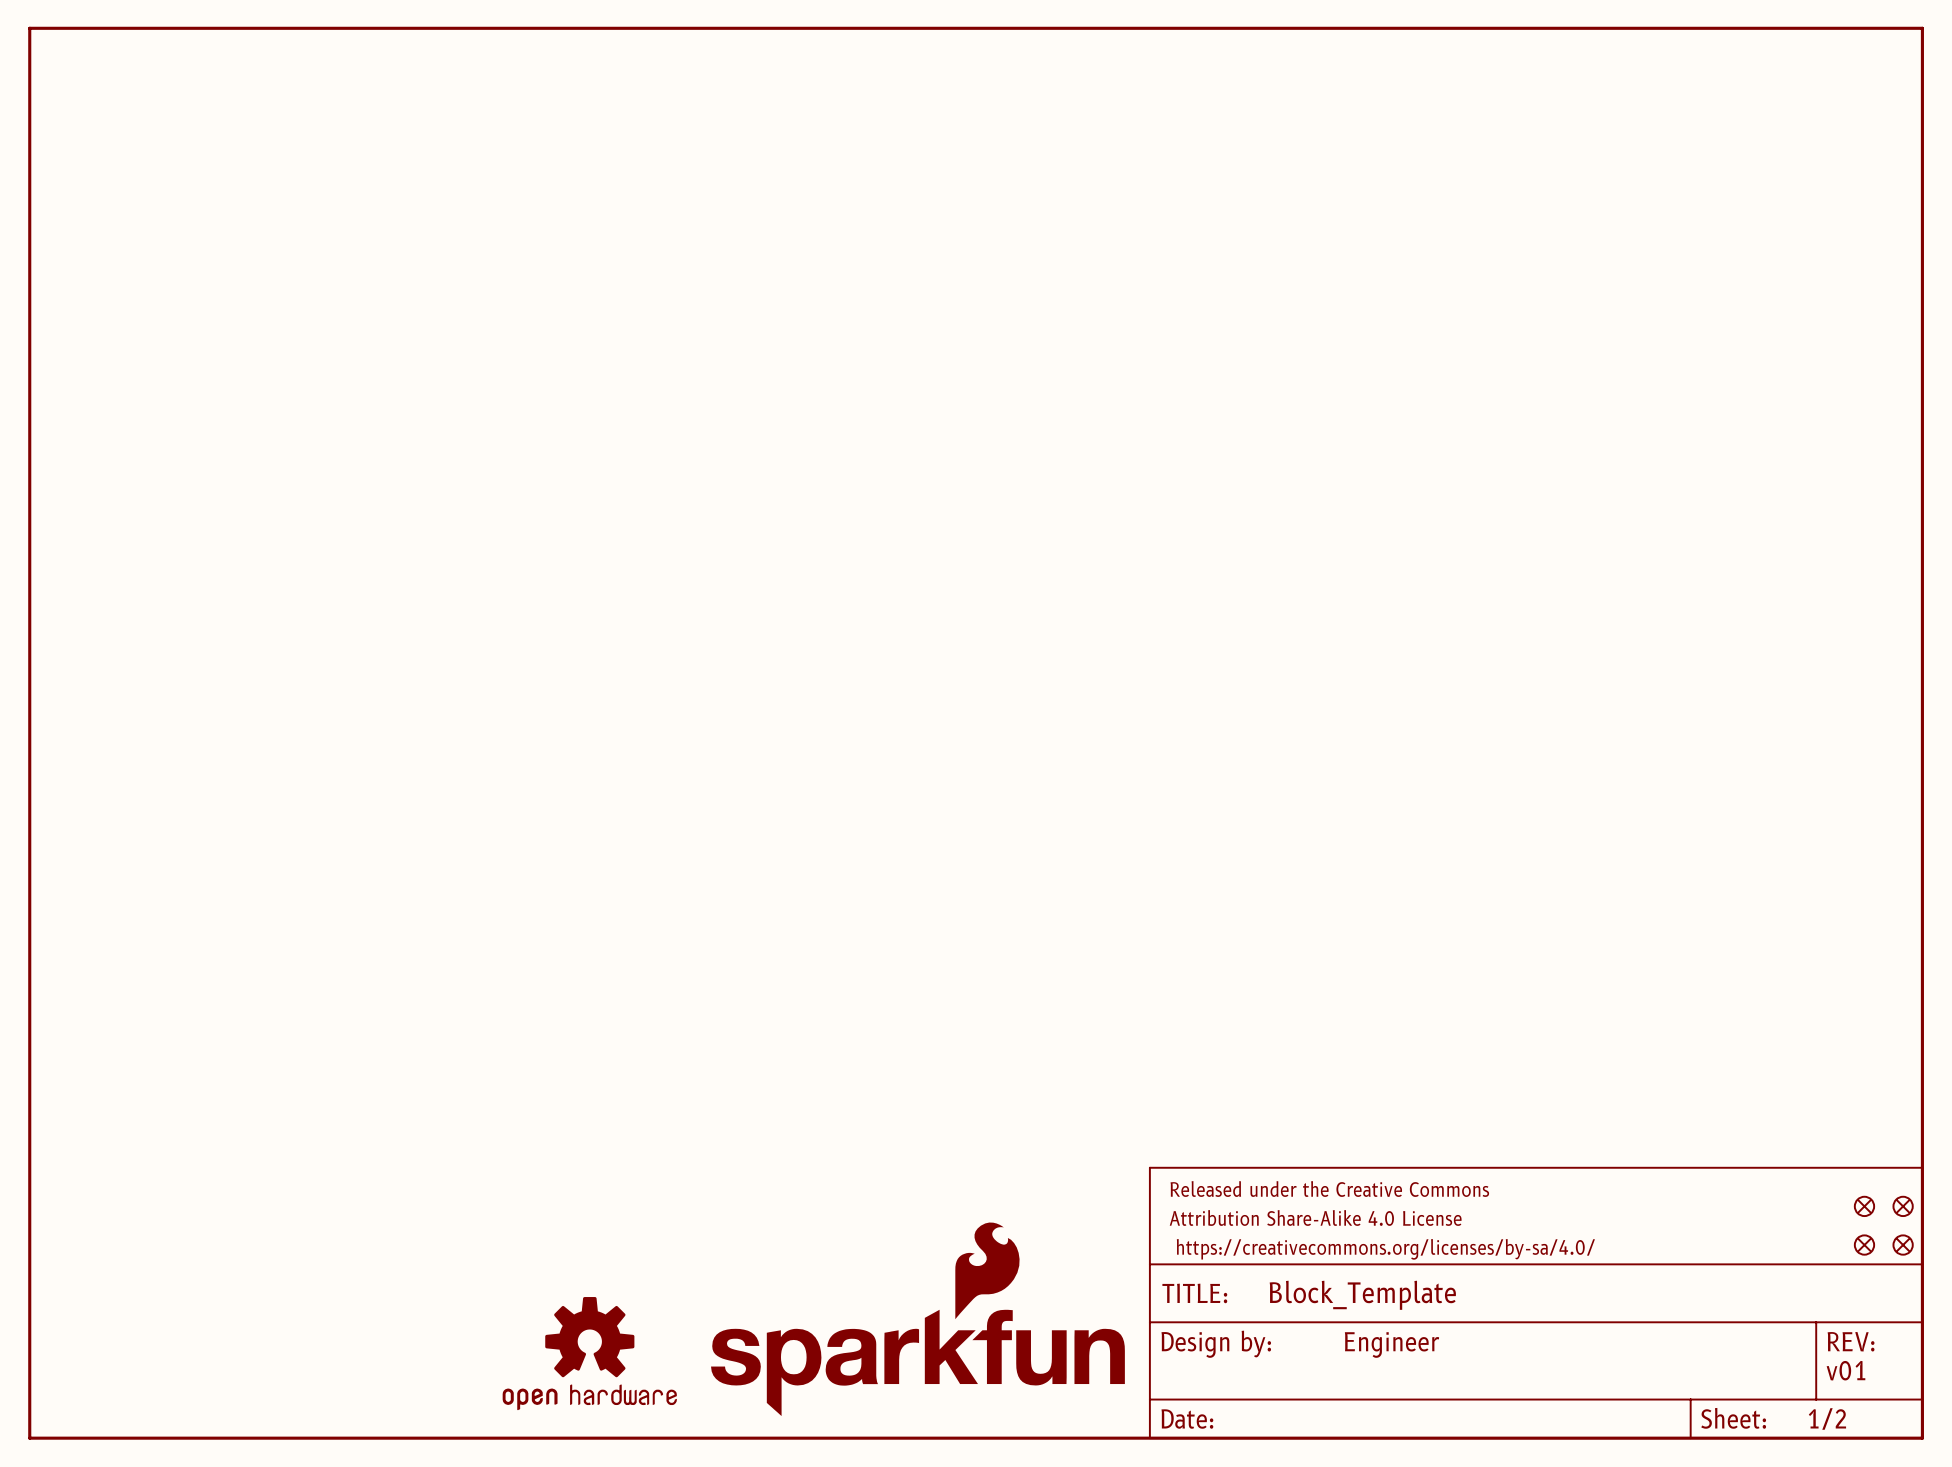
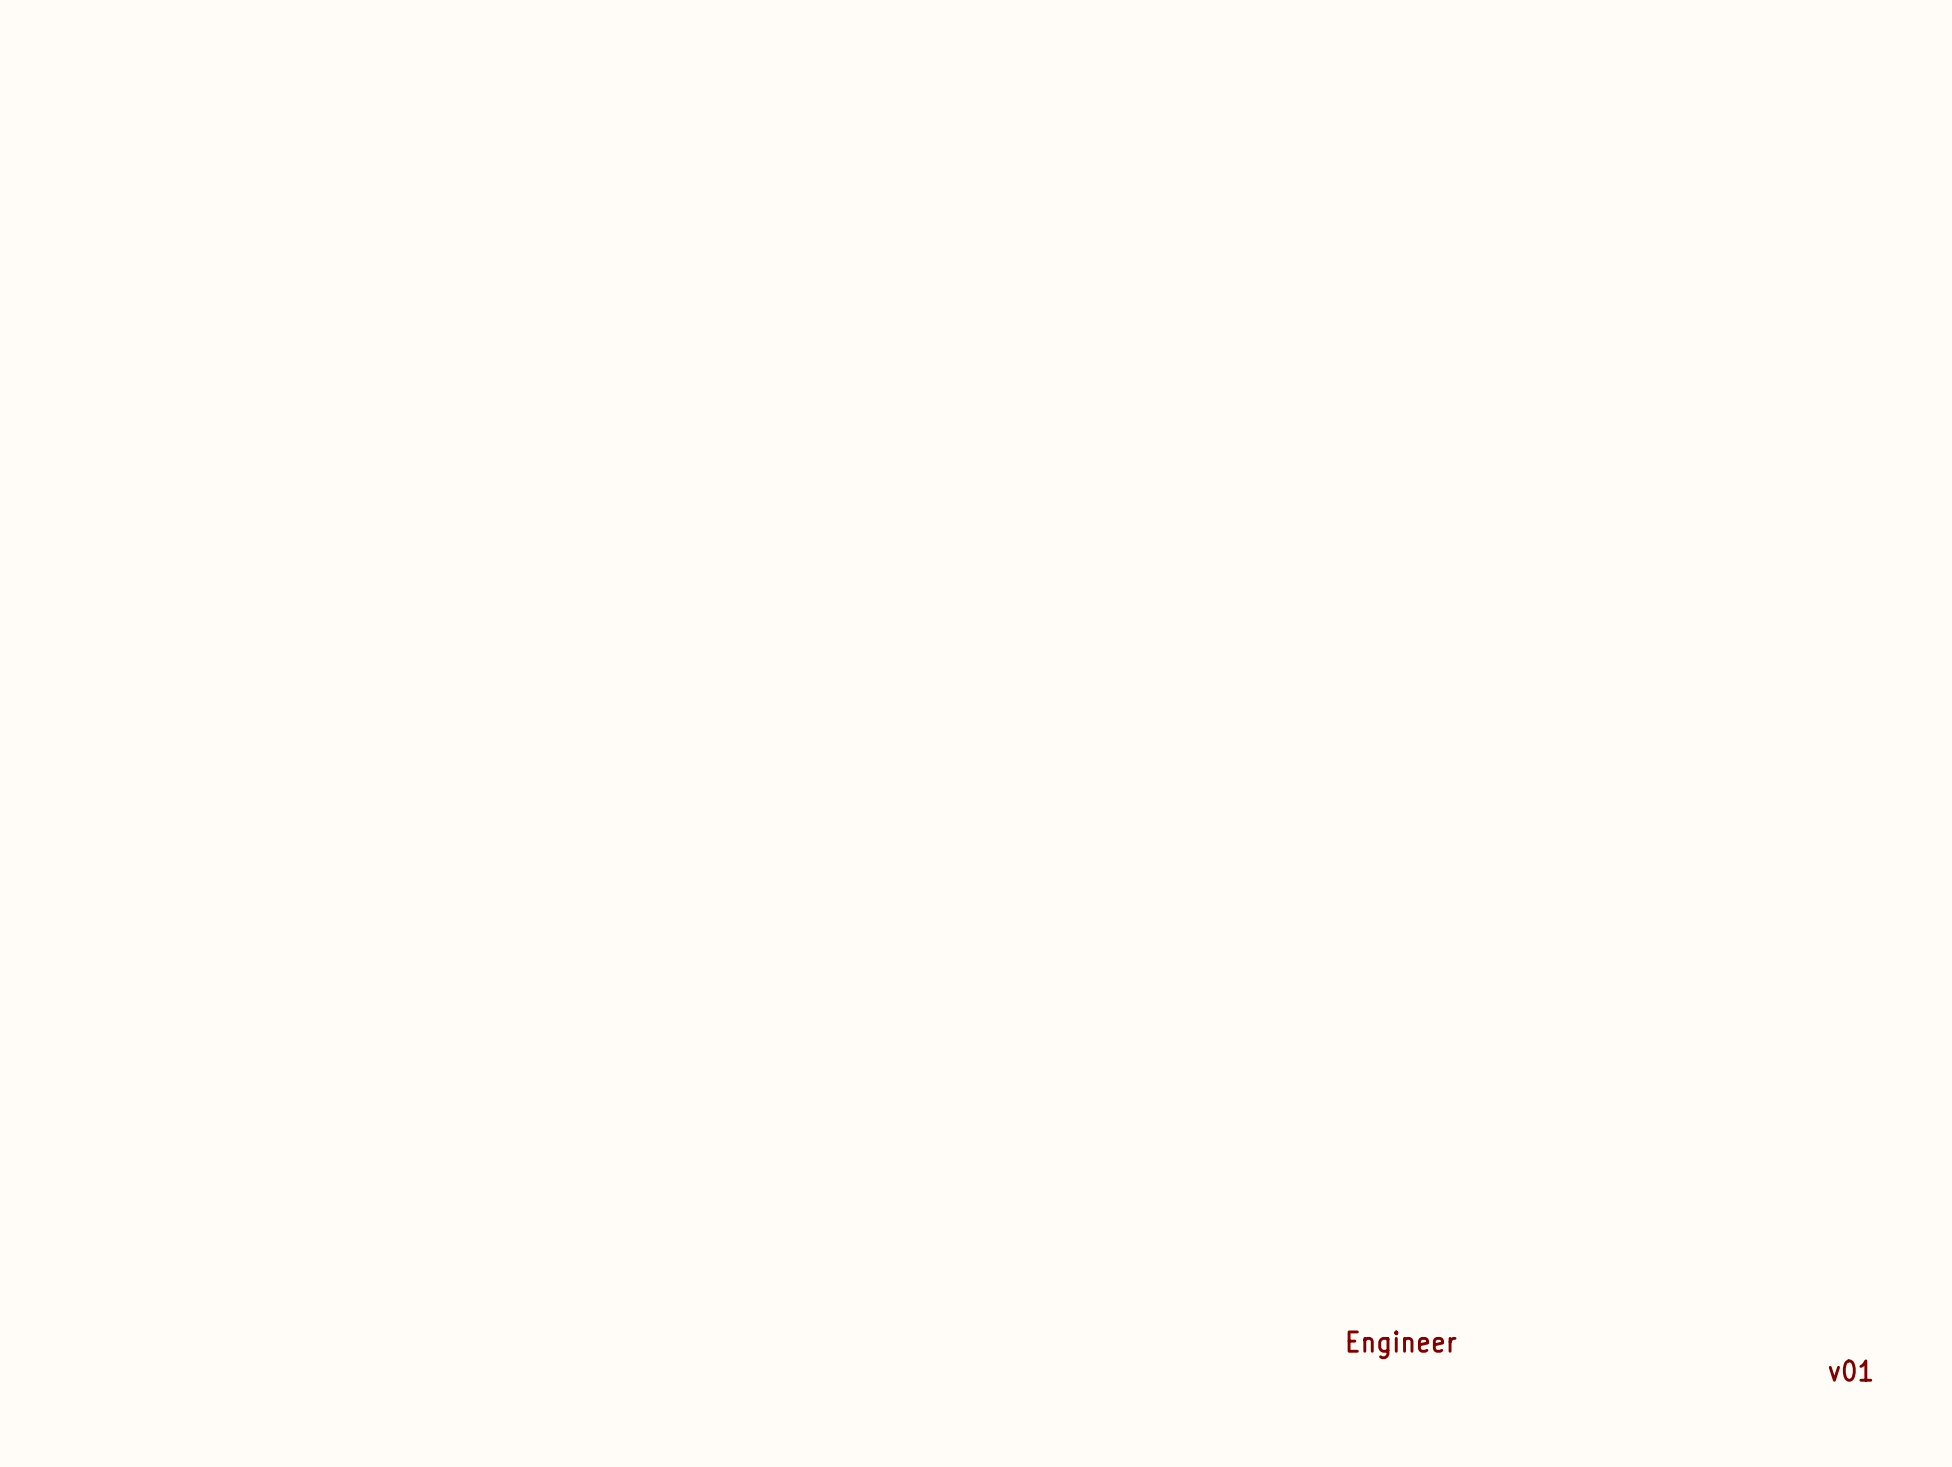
part: (976, 733) -> none
part: (1864, 1206) -> none
part: (1903, 1206) -> none
part: (1864, 1245) -> none
part: (1903, 1245) -> none
part: (1536, 1302) -> none
part: (917, 1319) -> none
part: (589, 1353) -> none

